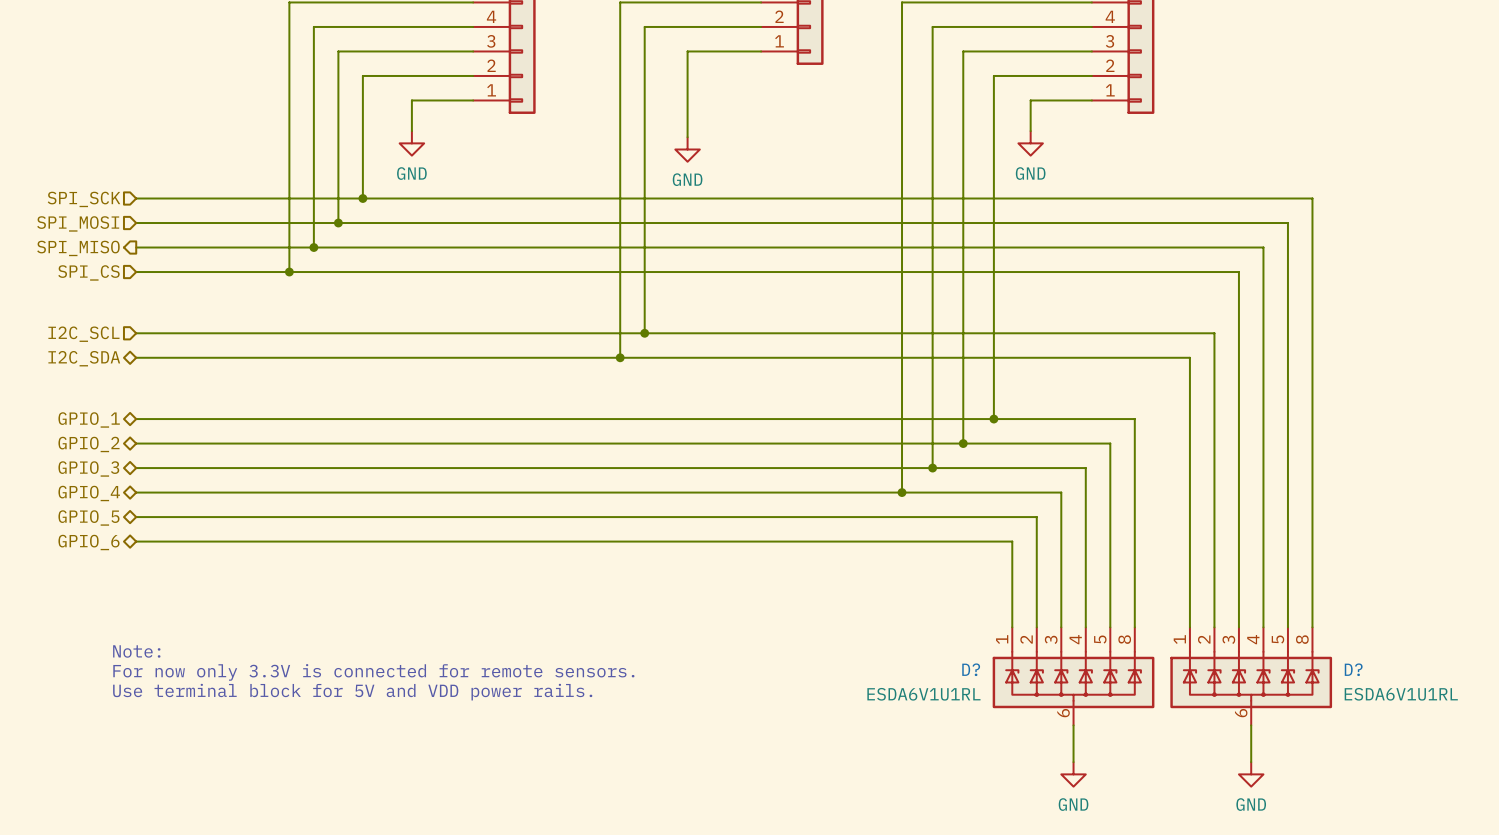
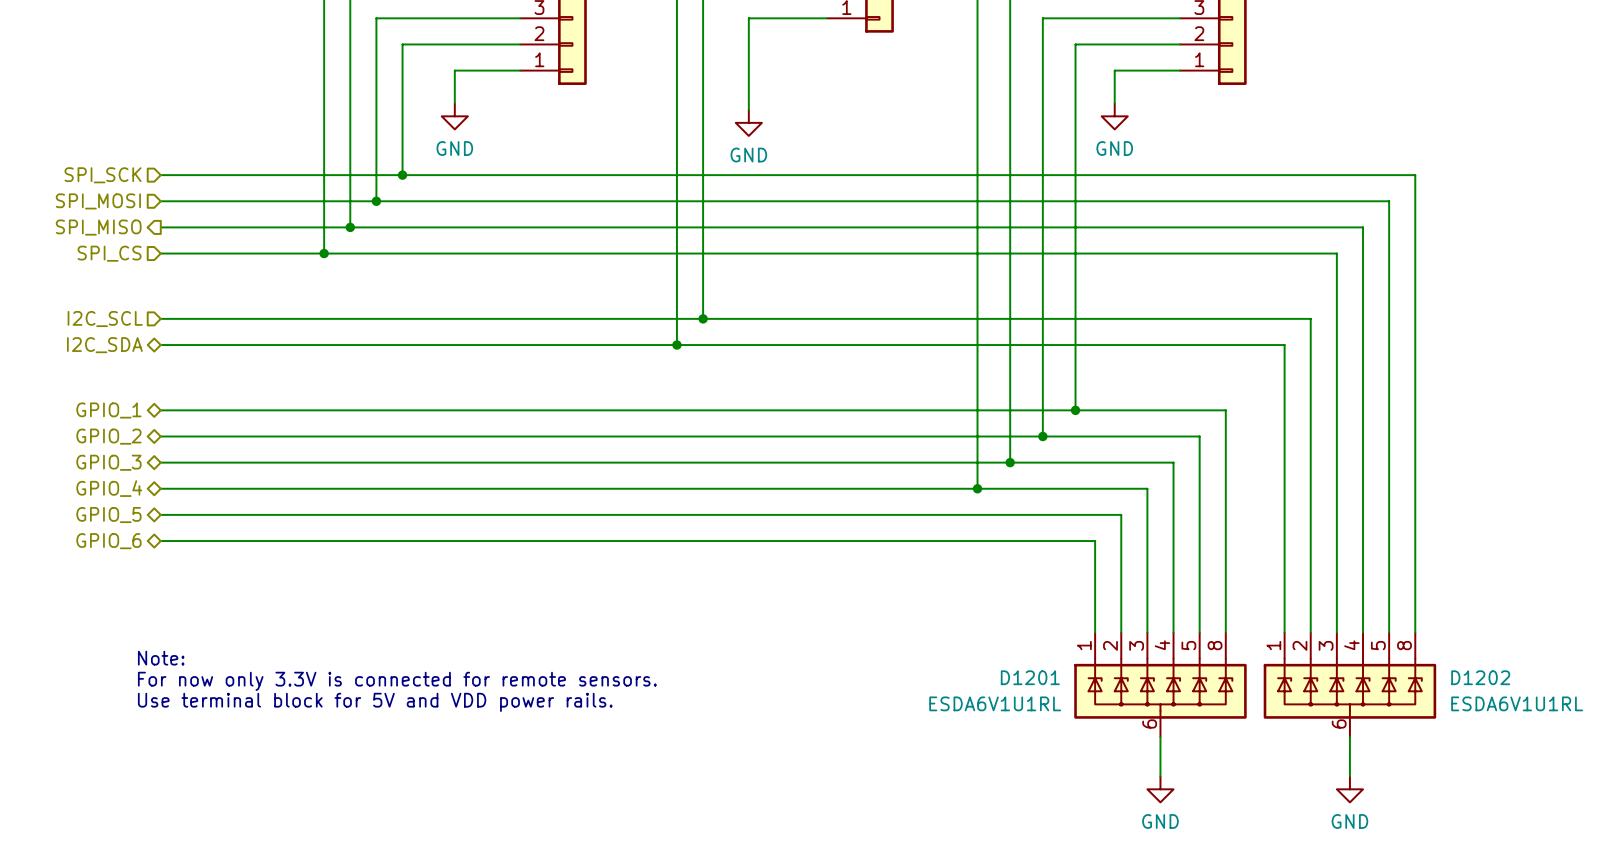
D? name: D? (971, 669) -> D1201 (1030, 677)
D? name: D? (1353, 669) -> D1202 (1480, 677)

